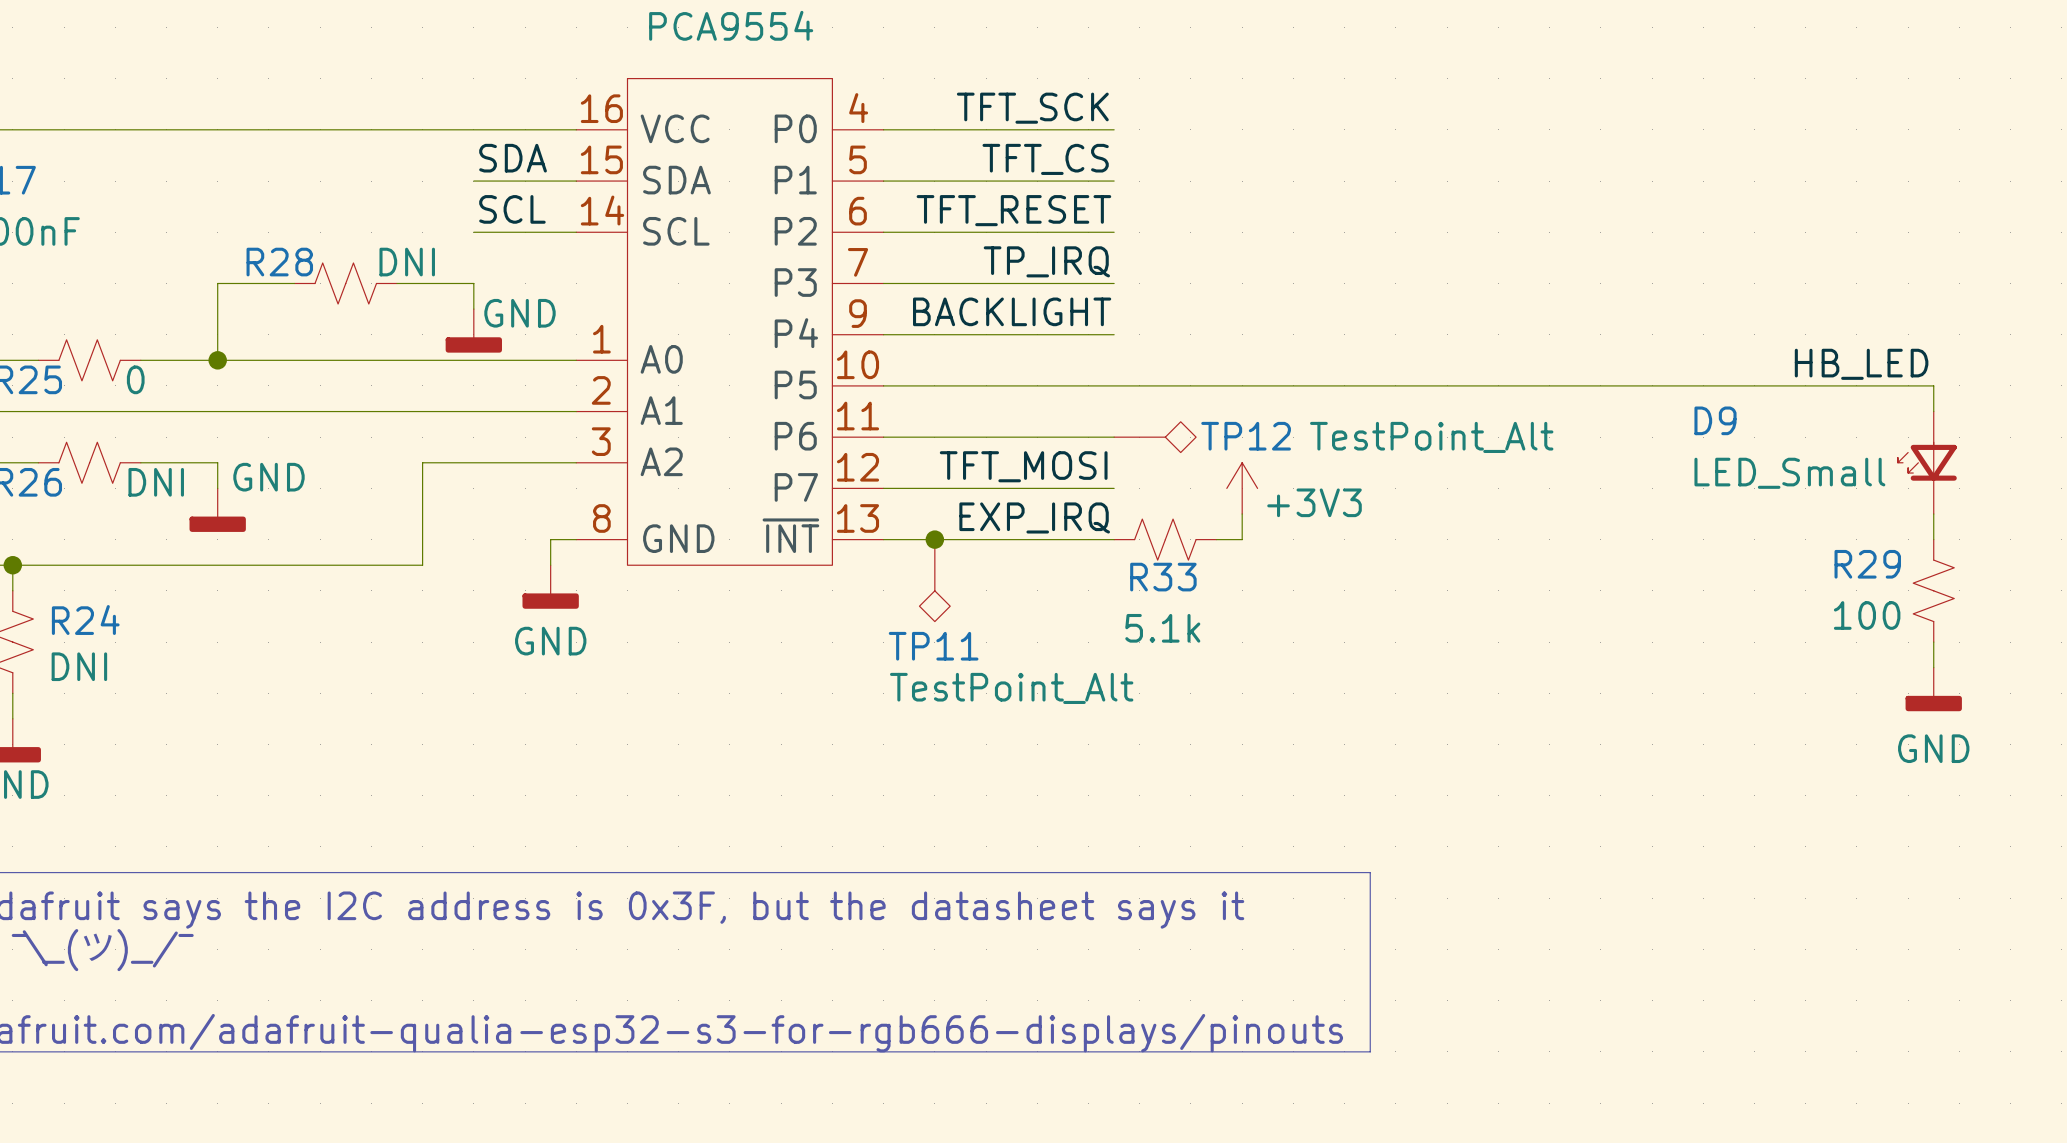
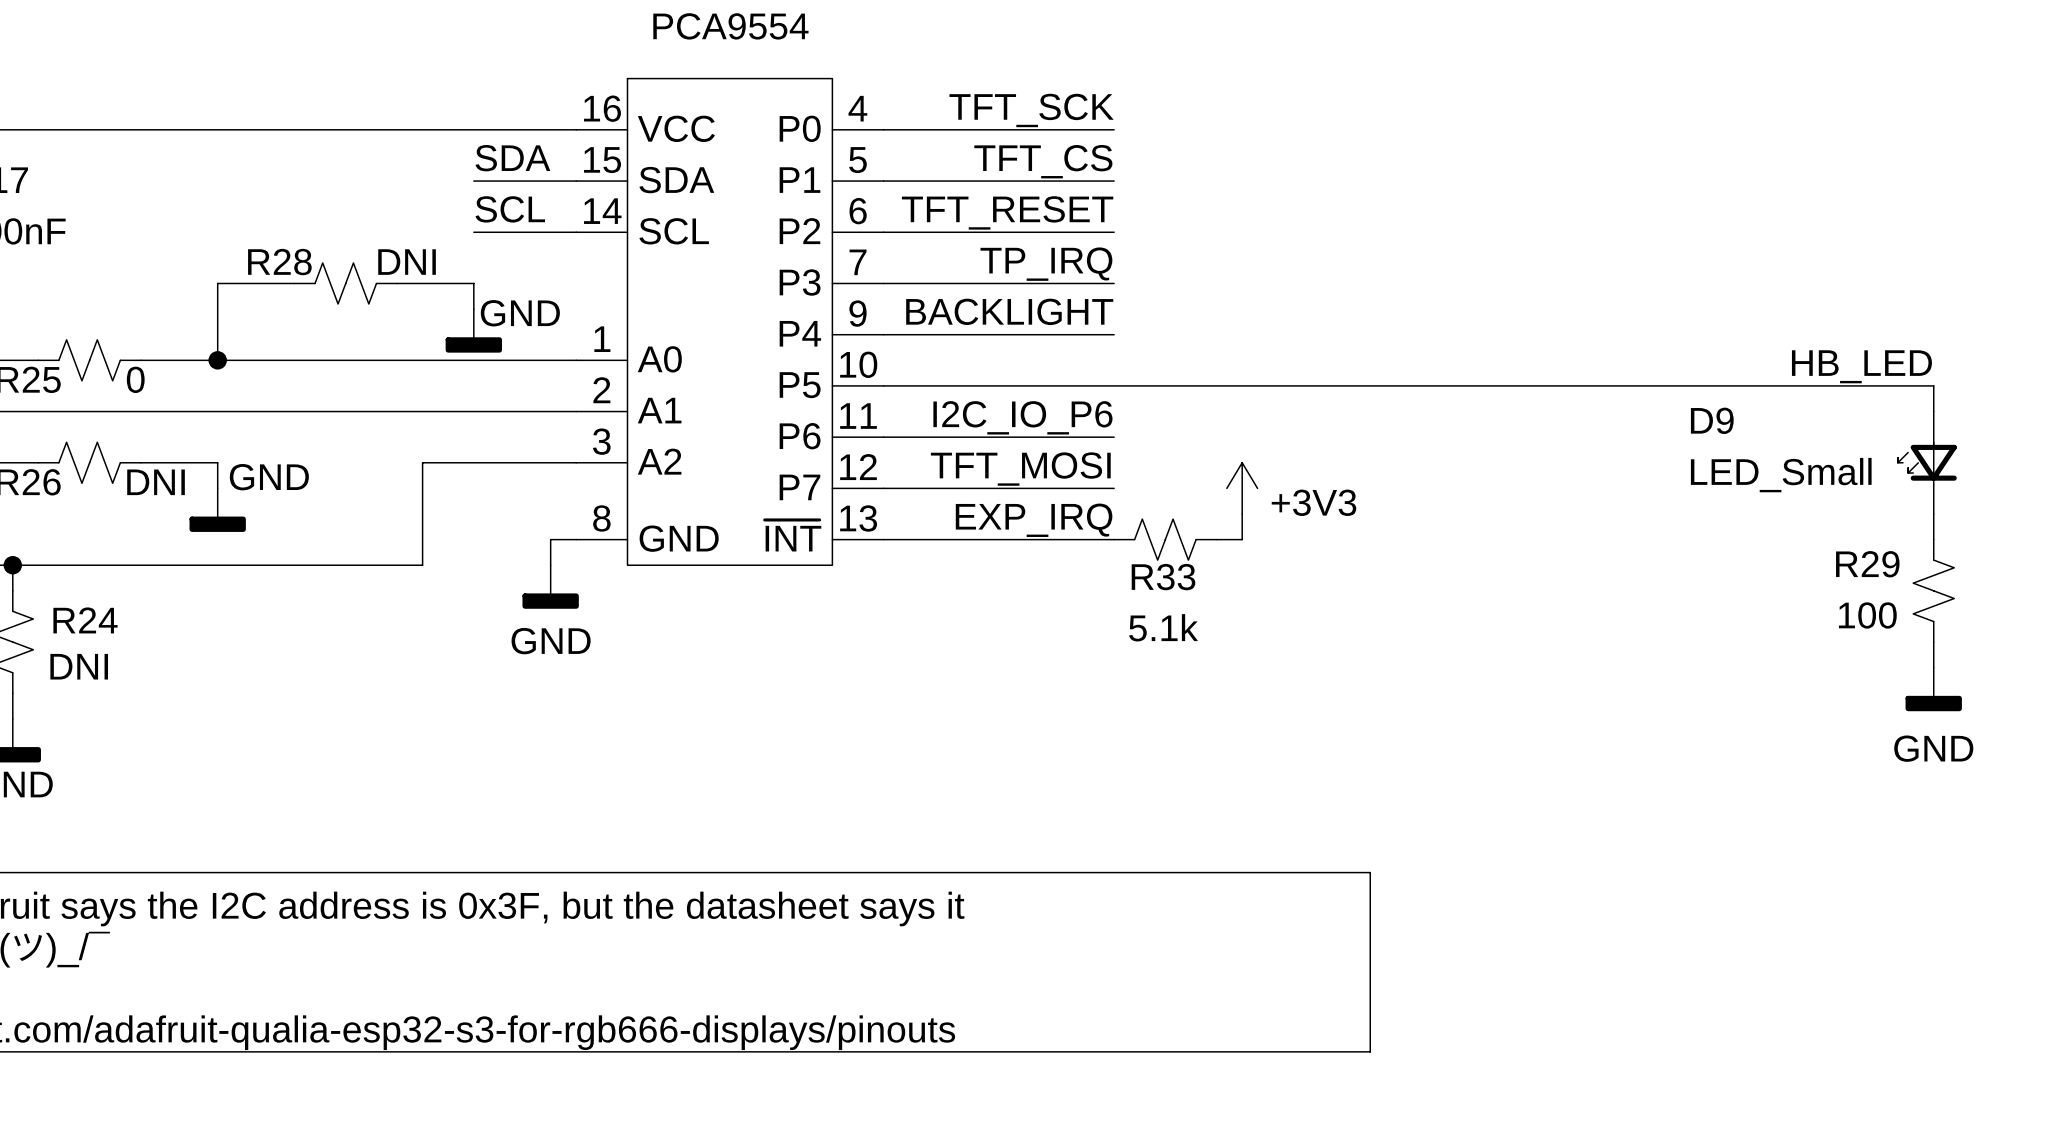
label: none -> I2C_IO_P6 (1022, 417)
TP12: TestPoint_Alt (1155, 437) -> none
junction: (934, 539) -> none
TP11: TestPoint_Alt (934, 580) -> none

